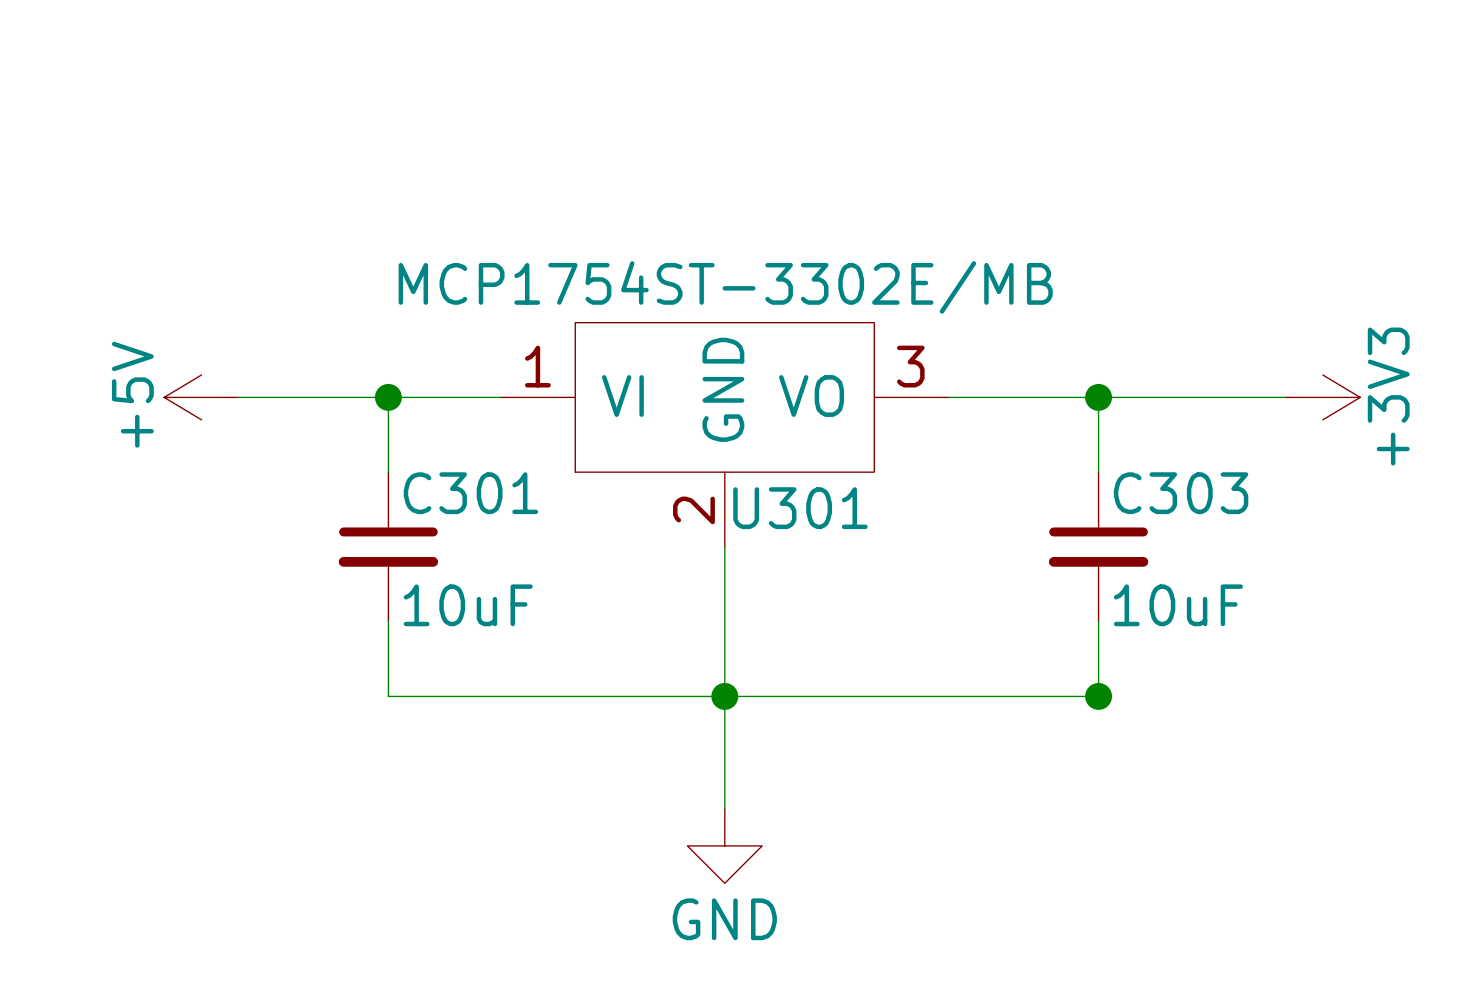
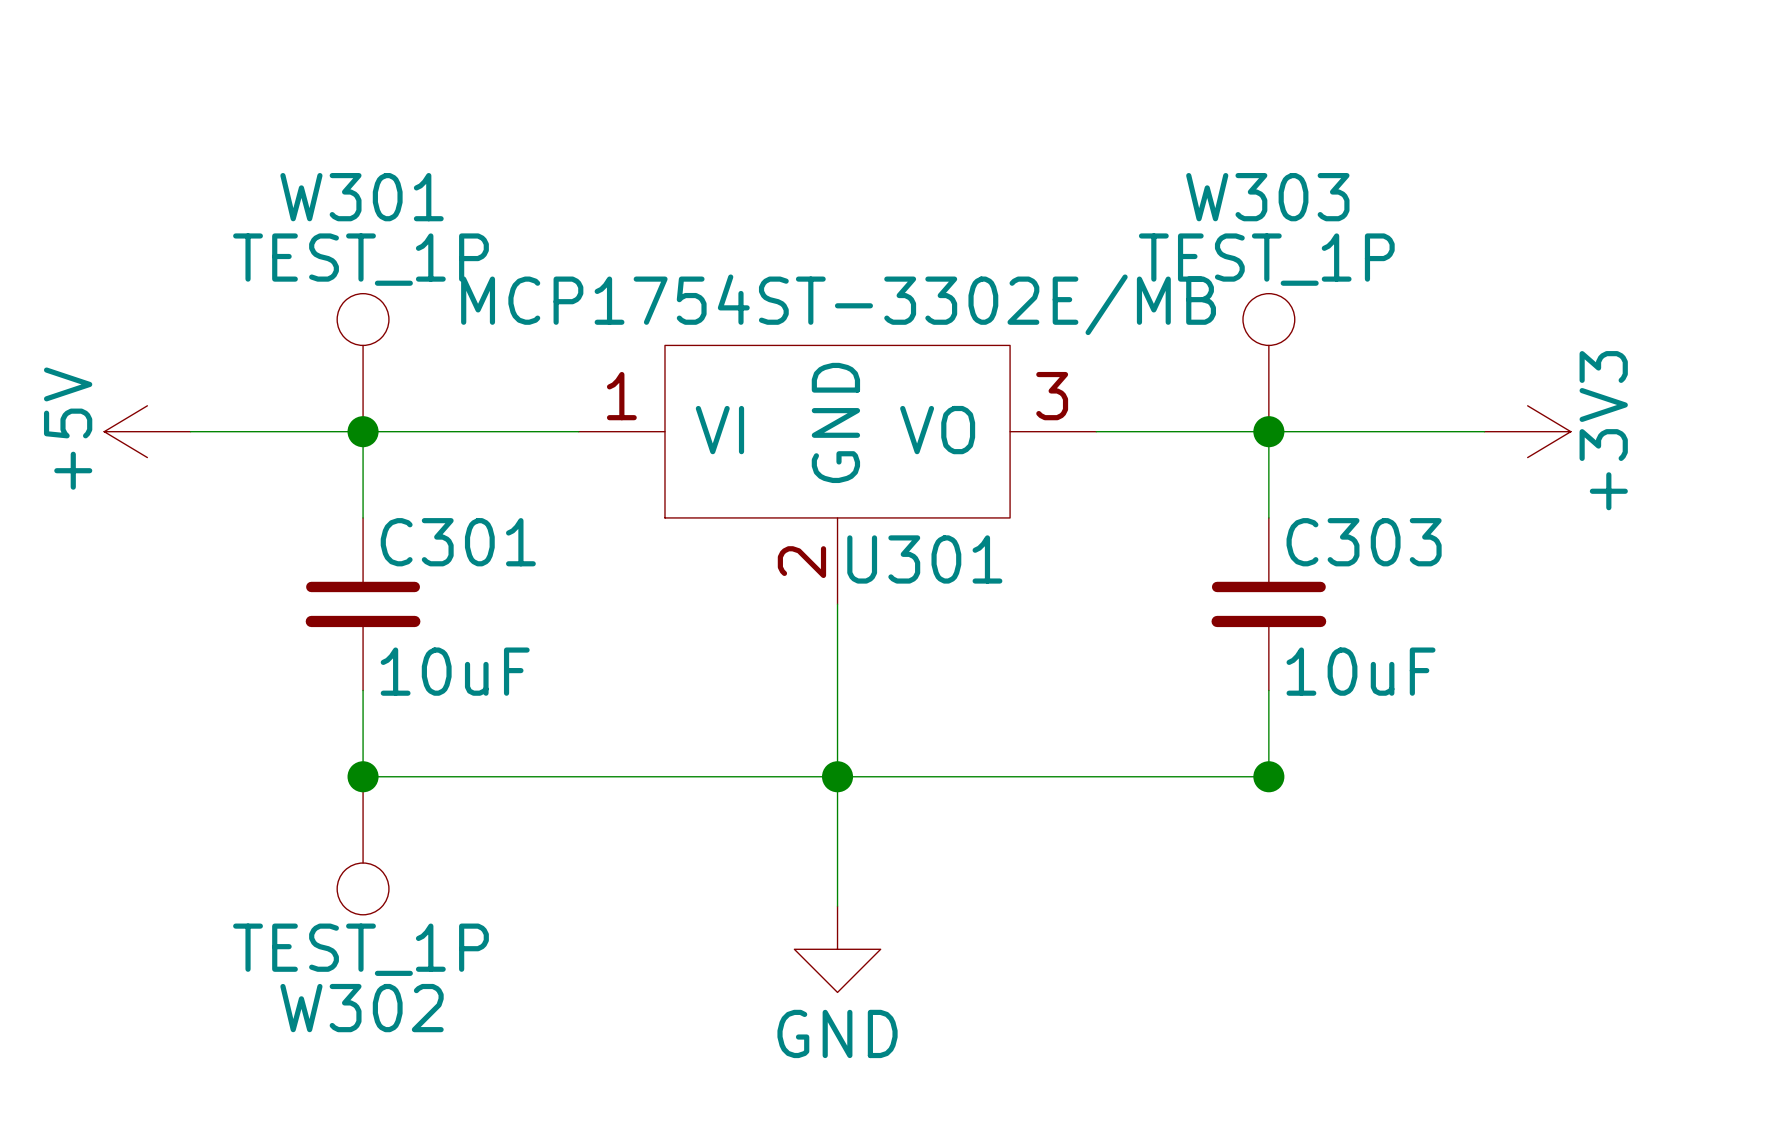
W301: none -> TEST_1P (363, 362)
W303: none -> TEST_1P (1268, 362)
power symbol position: +5V (201, 397) -> +5V (147, 431)
wire: (388, 397) (388, 472) -> (363, 431) (363, 517)
junction position: (388, 397) -> (363, 431)
C301 position: (388, 546) -> (363, 604)
wire: (388, 621) (388, 696) -> (363, 690) (363, 776) (449, 776)
junction: none -> (363, 776)
W302: none -> TEST_1P (363, 845)

